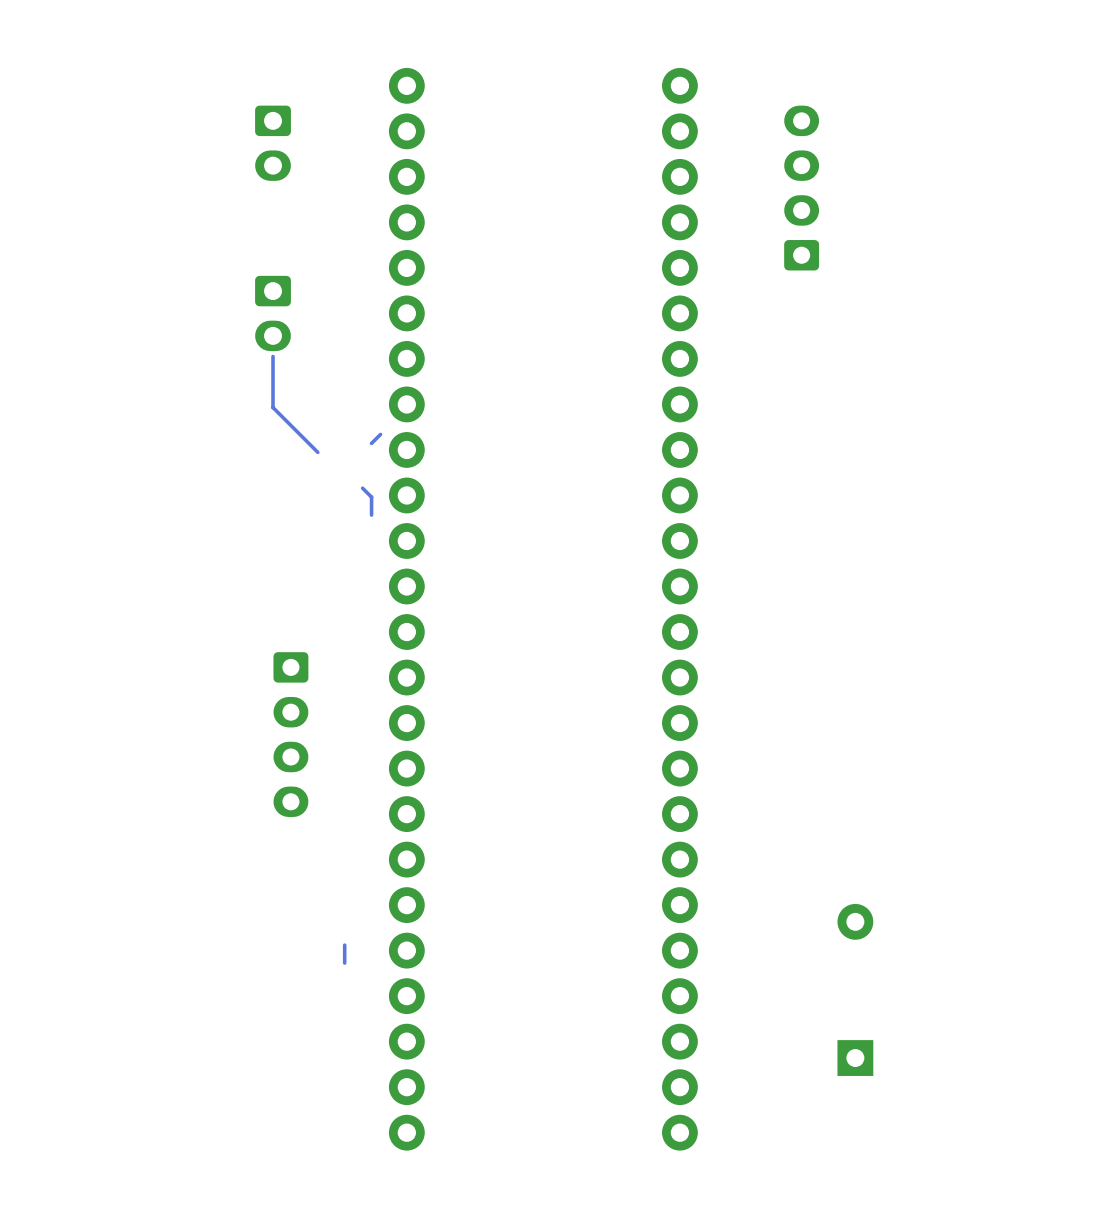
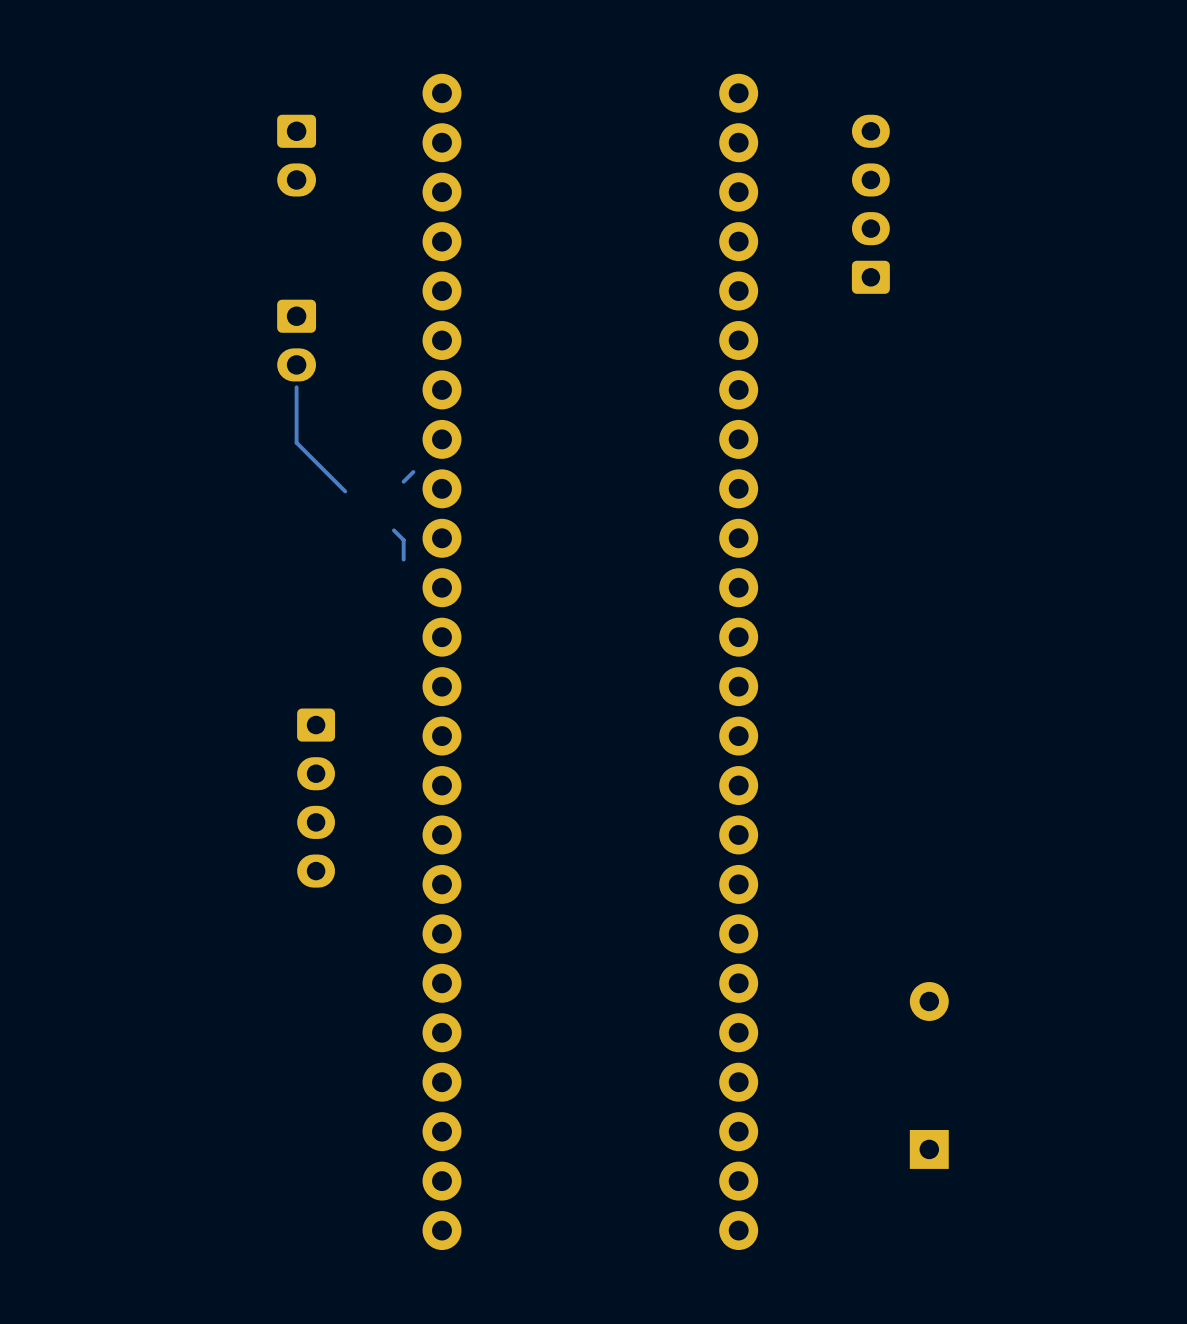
track: (344, 945) (344, 963) -> none

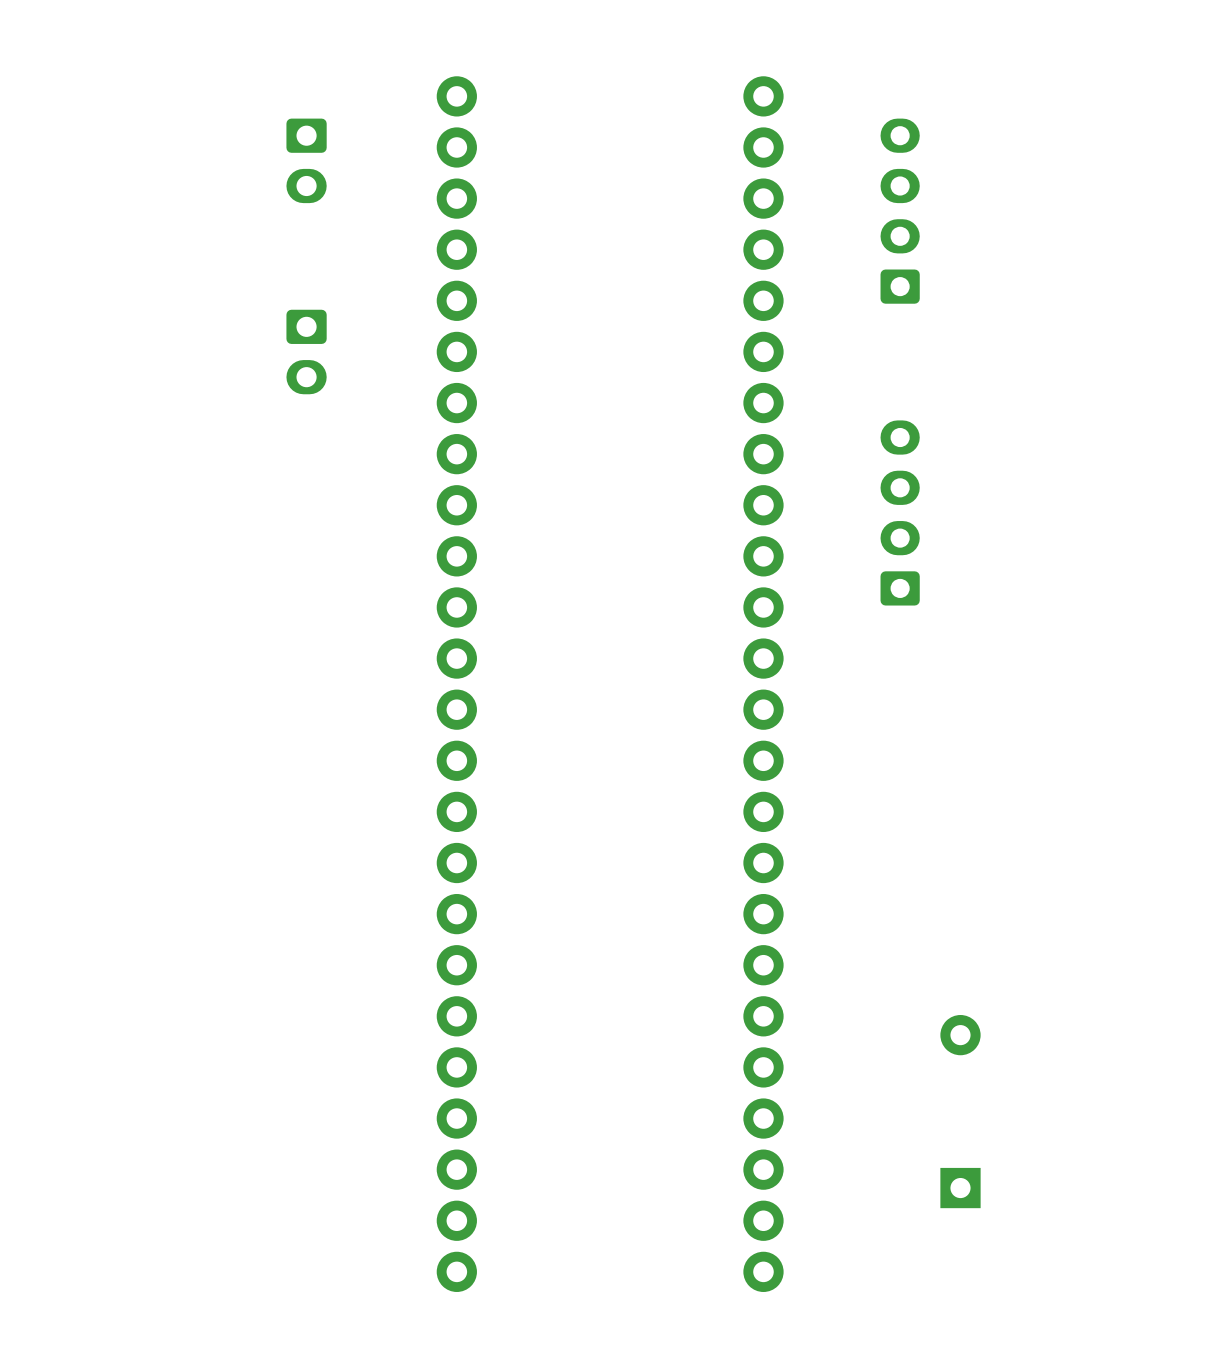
track: (296, 387) (296, 442) (345, 491) -> none
track: (413, 471) (403, 481) -> none
part: none -> (900, 512)
track: (393, 530) (403, 540) (403, 559) -> none
part: (316, 798) -> none

